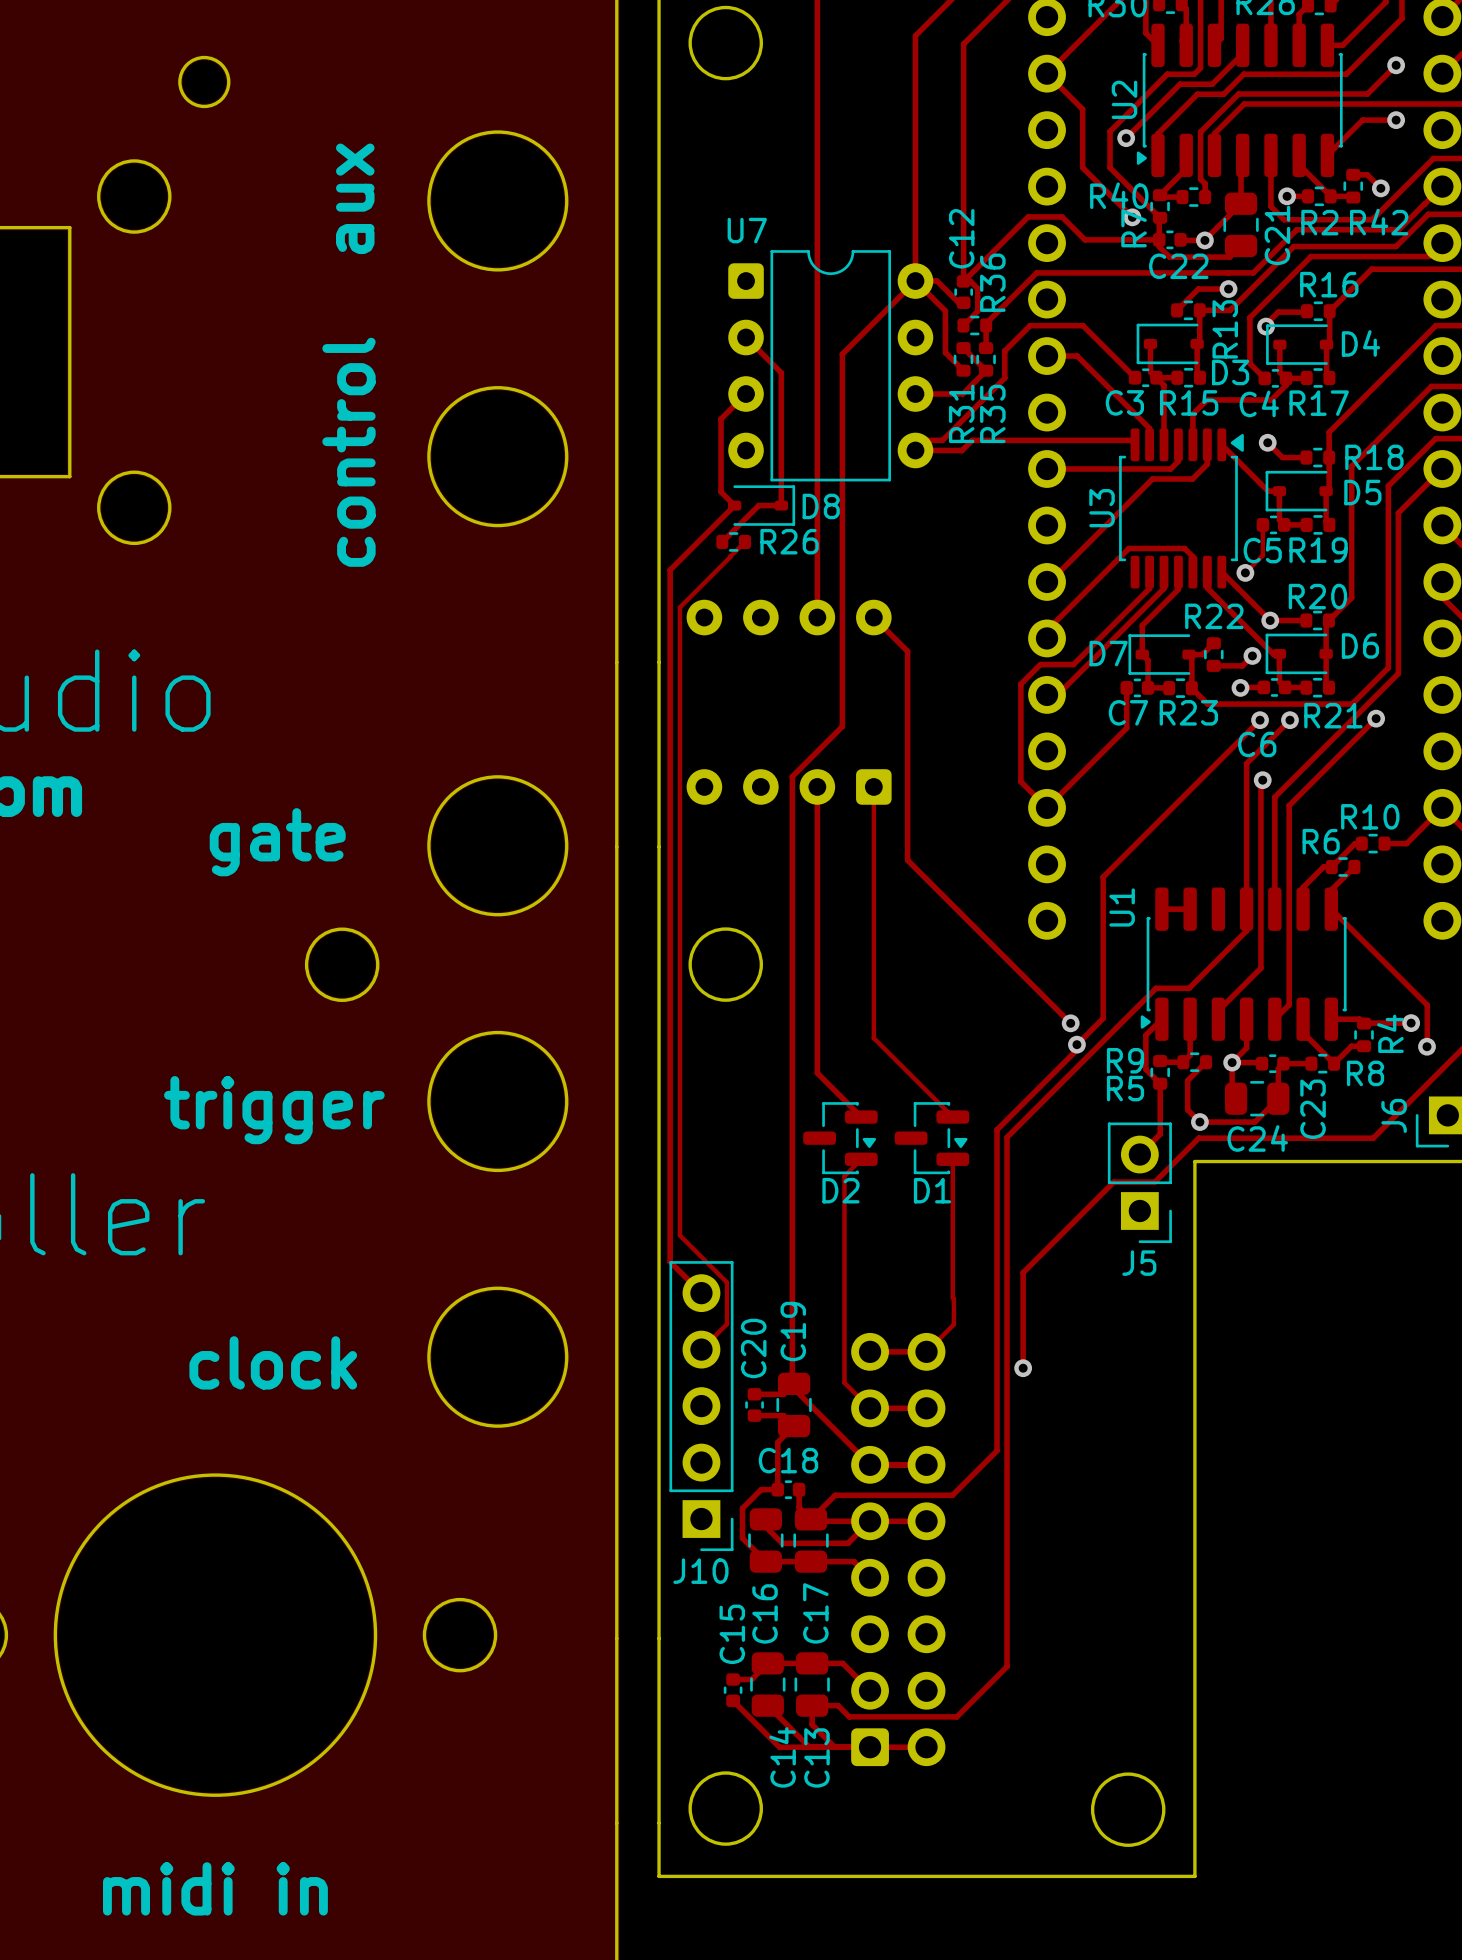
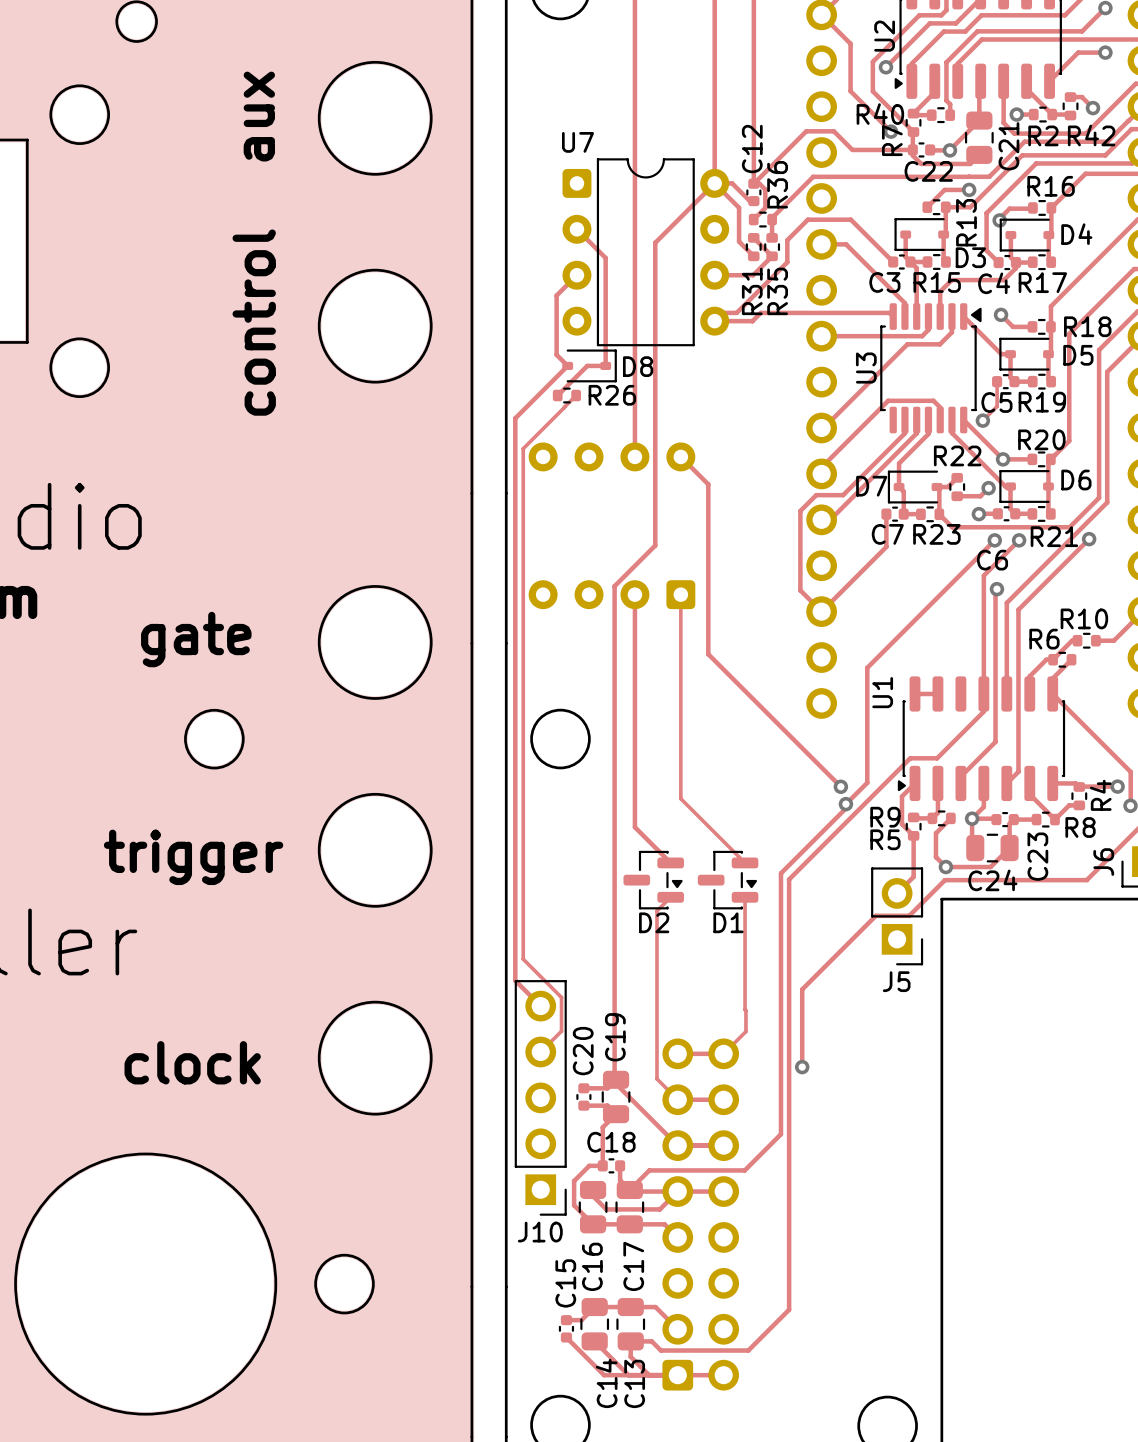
round board edge position: (342, 964) -> (214, 739)

